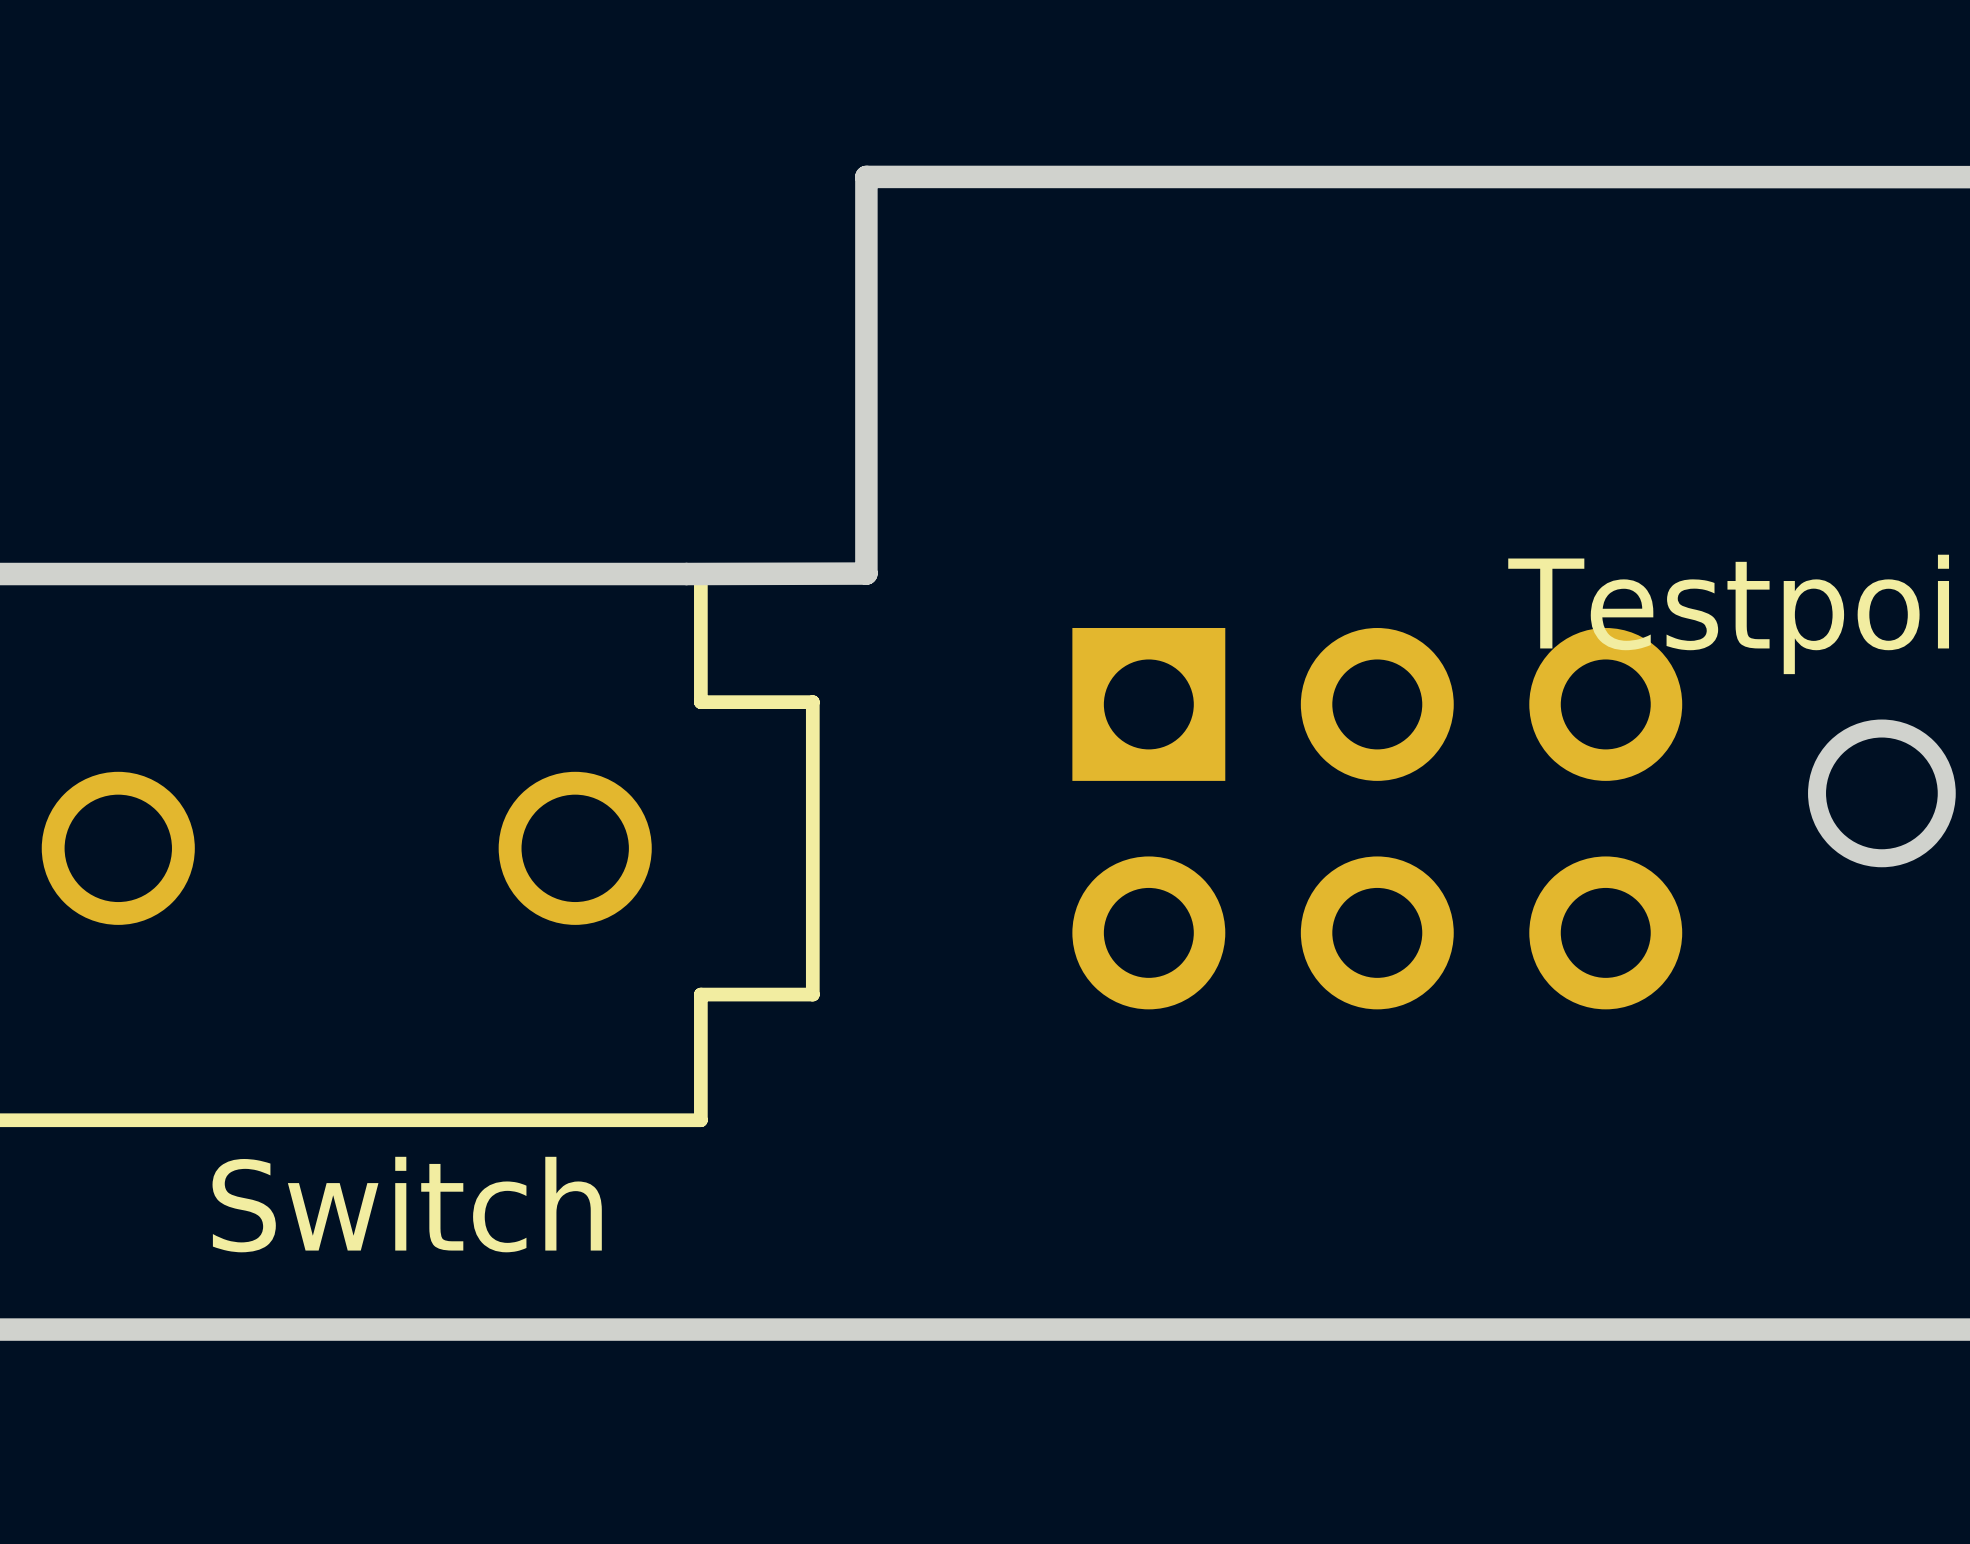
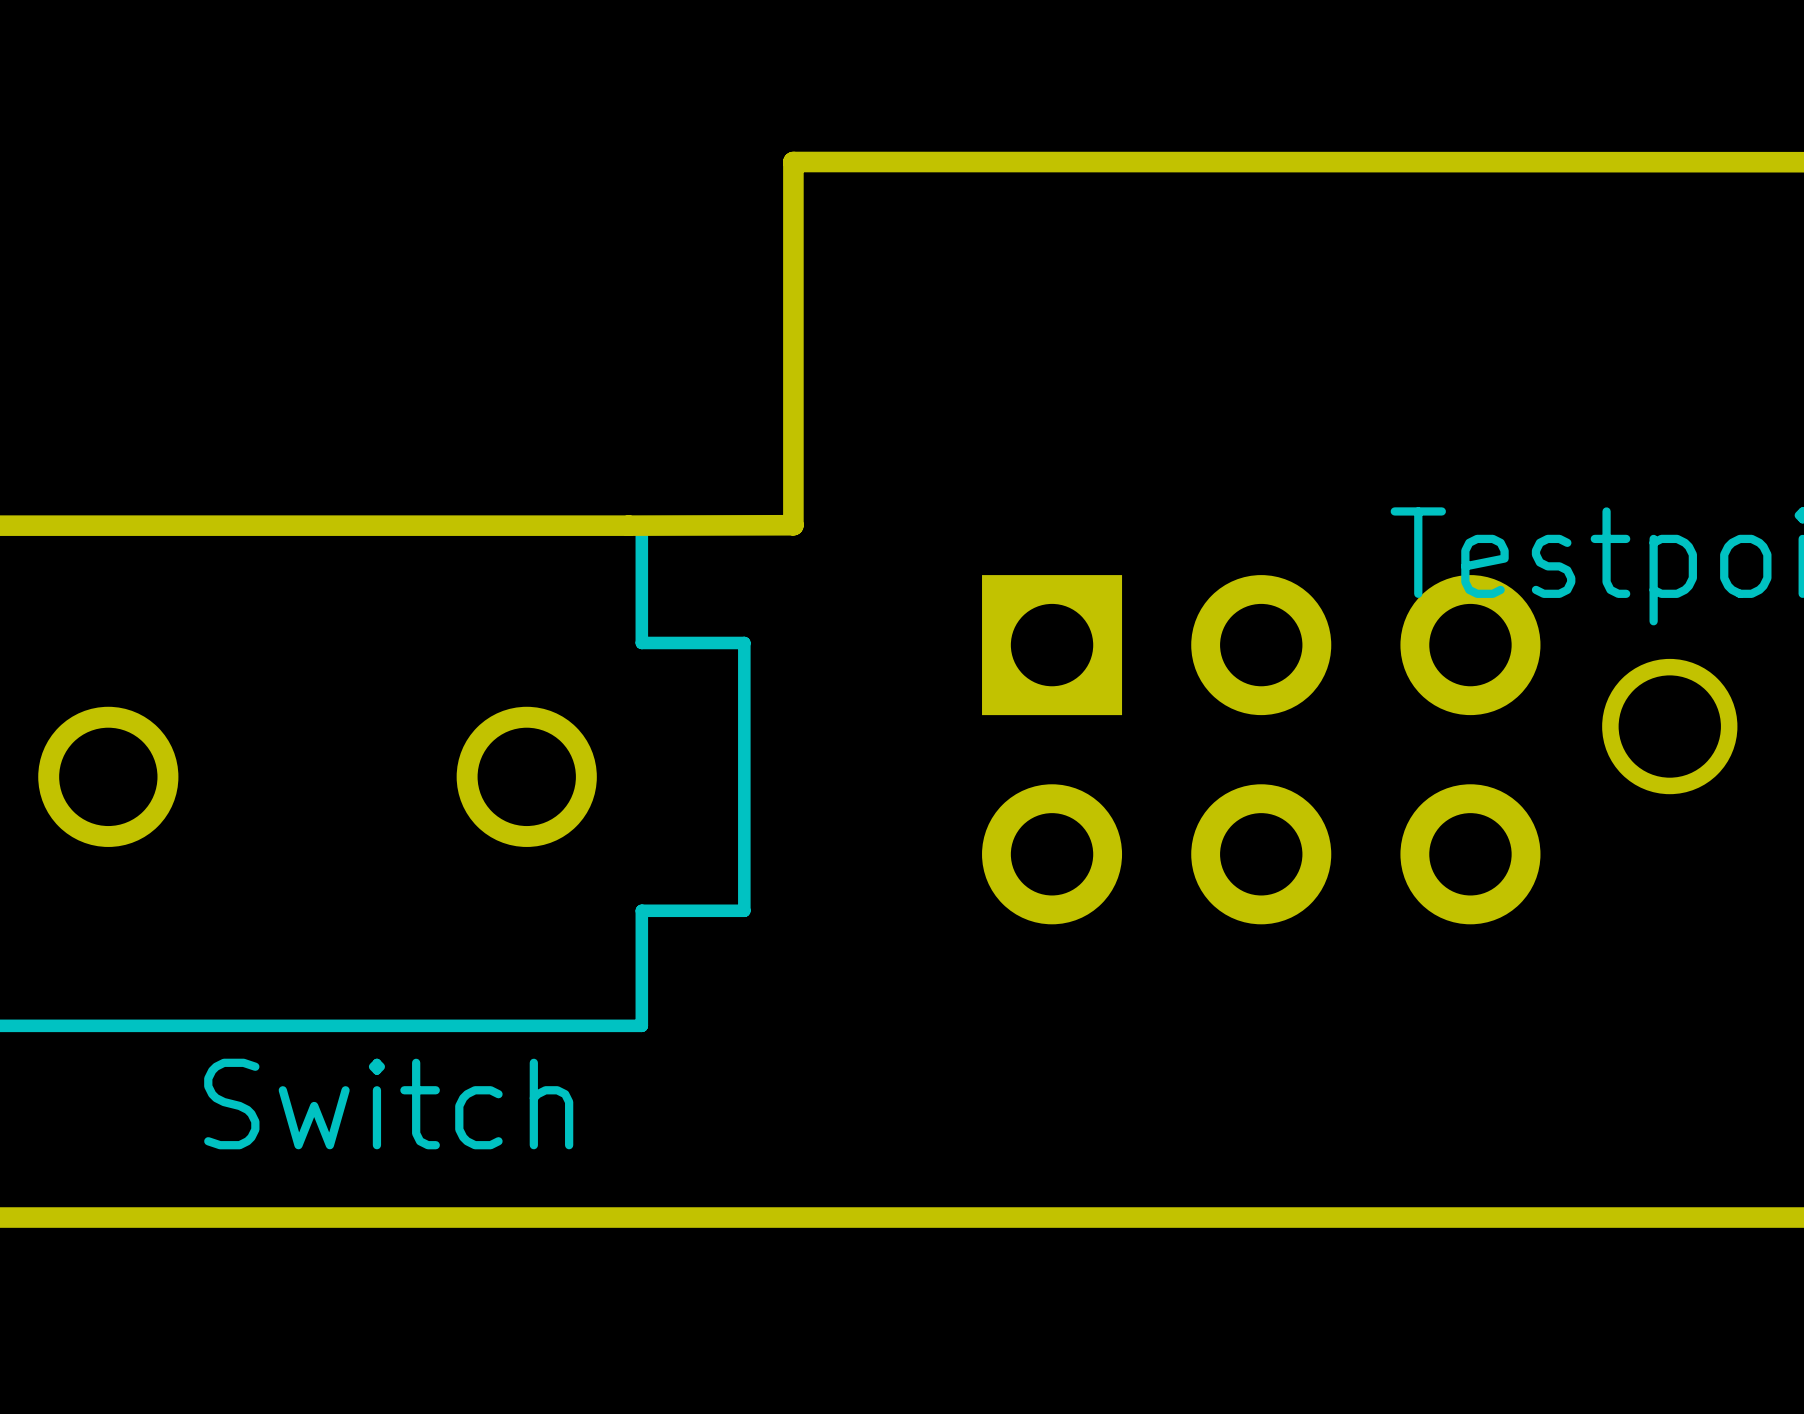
round board edge position: (1881, 793) -> (1669, 726)

